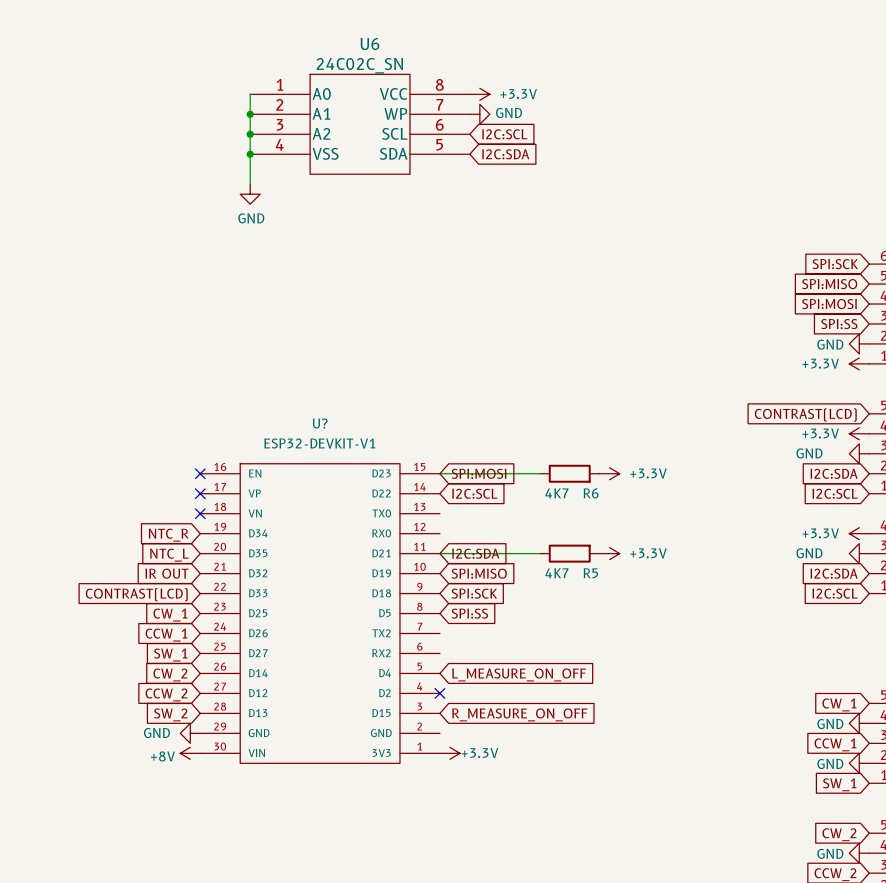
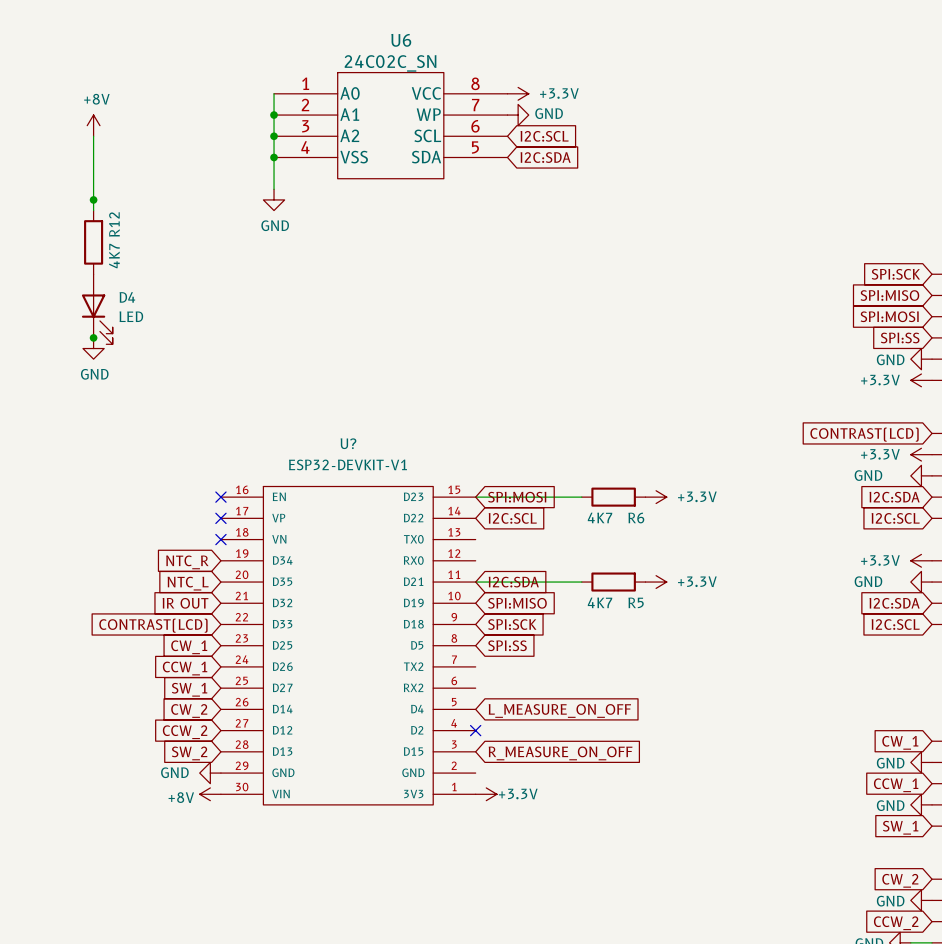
power symbol: none -> +8V (93, 125)
wire: none -> (93, 136) (93, 210)
junction: none -> (93, 199)
R12: none -> 4K7 (93, 242)
D4: none -> LED (97, 309)
junction: none -> (93, 337)
power symbol: none -> GND (93, 348)

